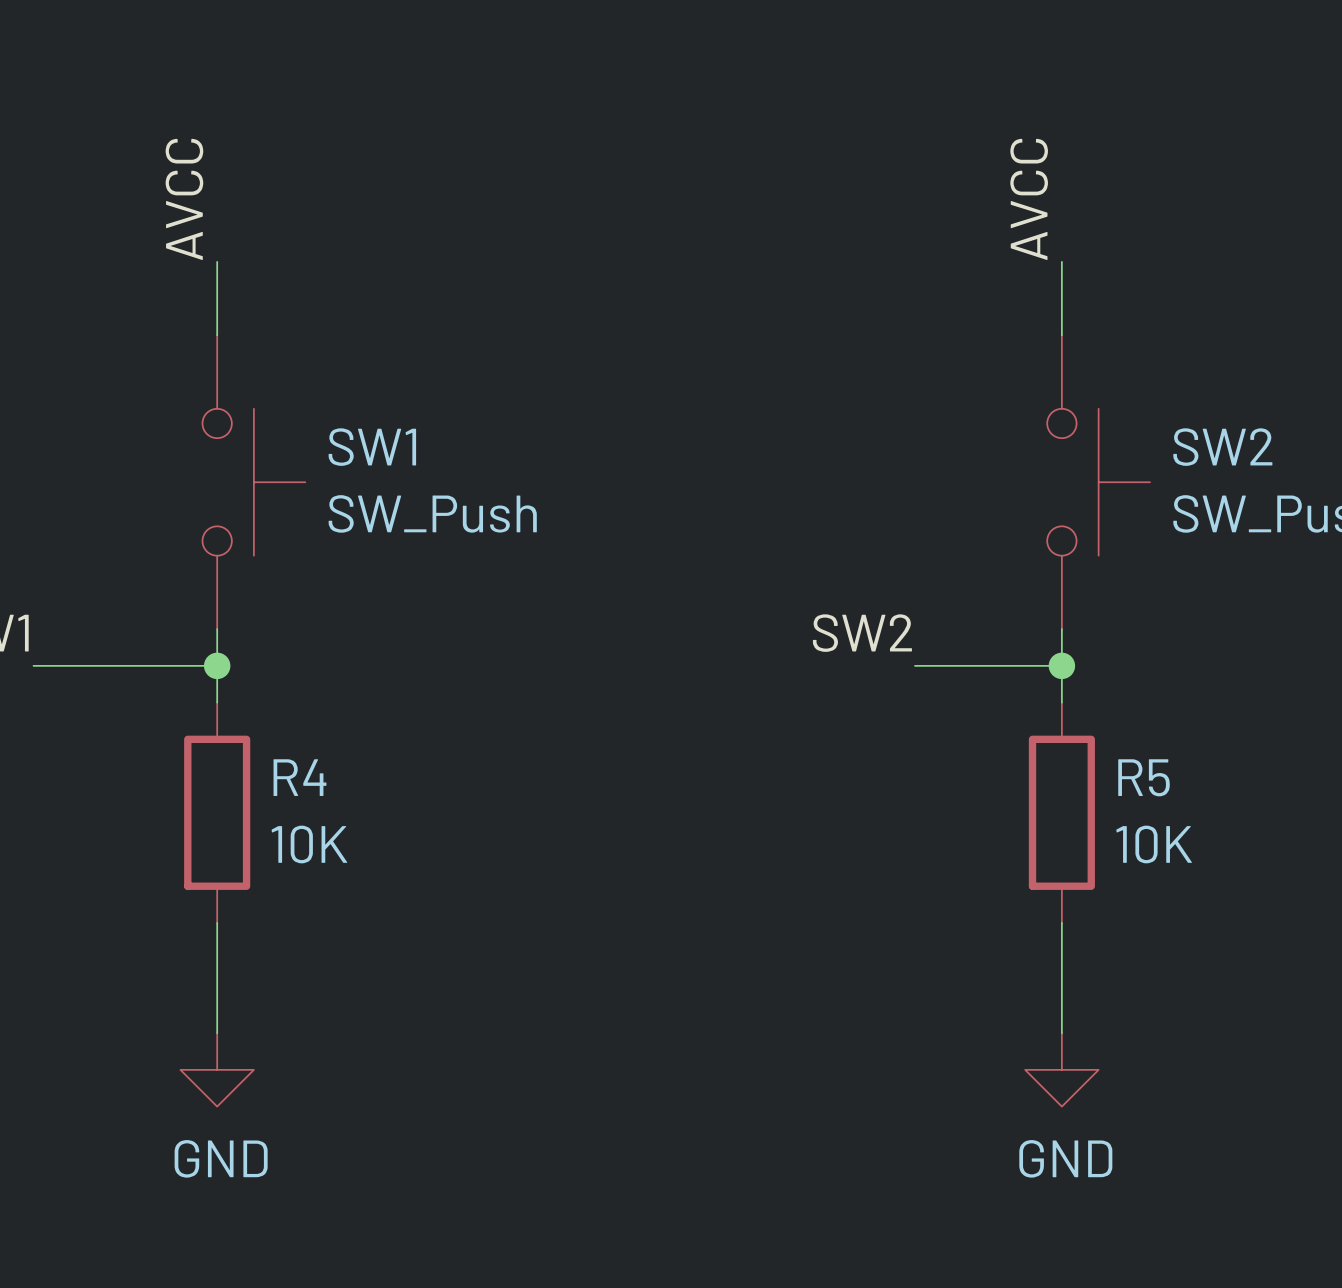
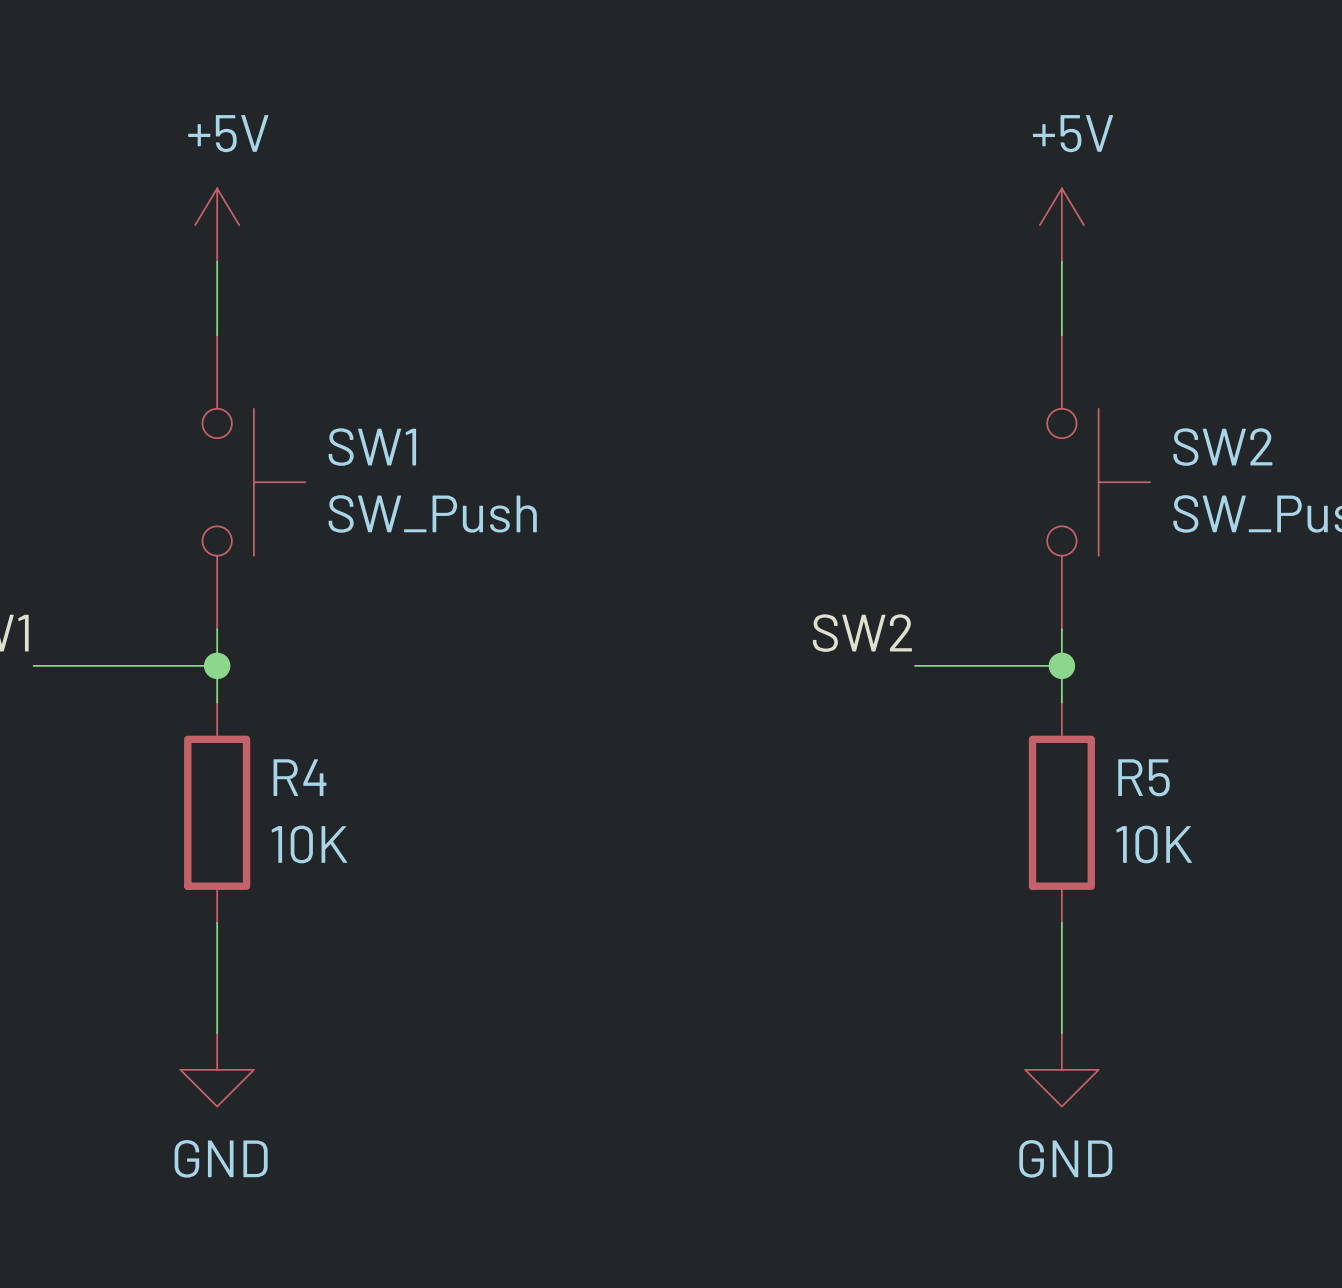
label: AVCC (184, 199) -> none
label: AVCC (1029, 199) -> none
power symbol: none -> +5V (217, 225)
power symbol: none -> +5V (1061, 225)

